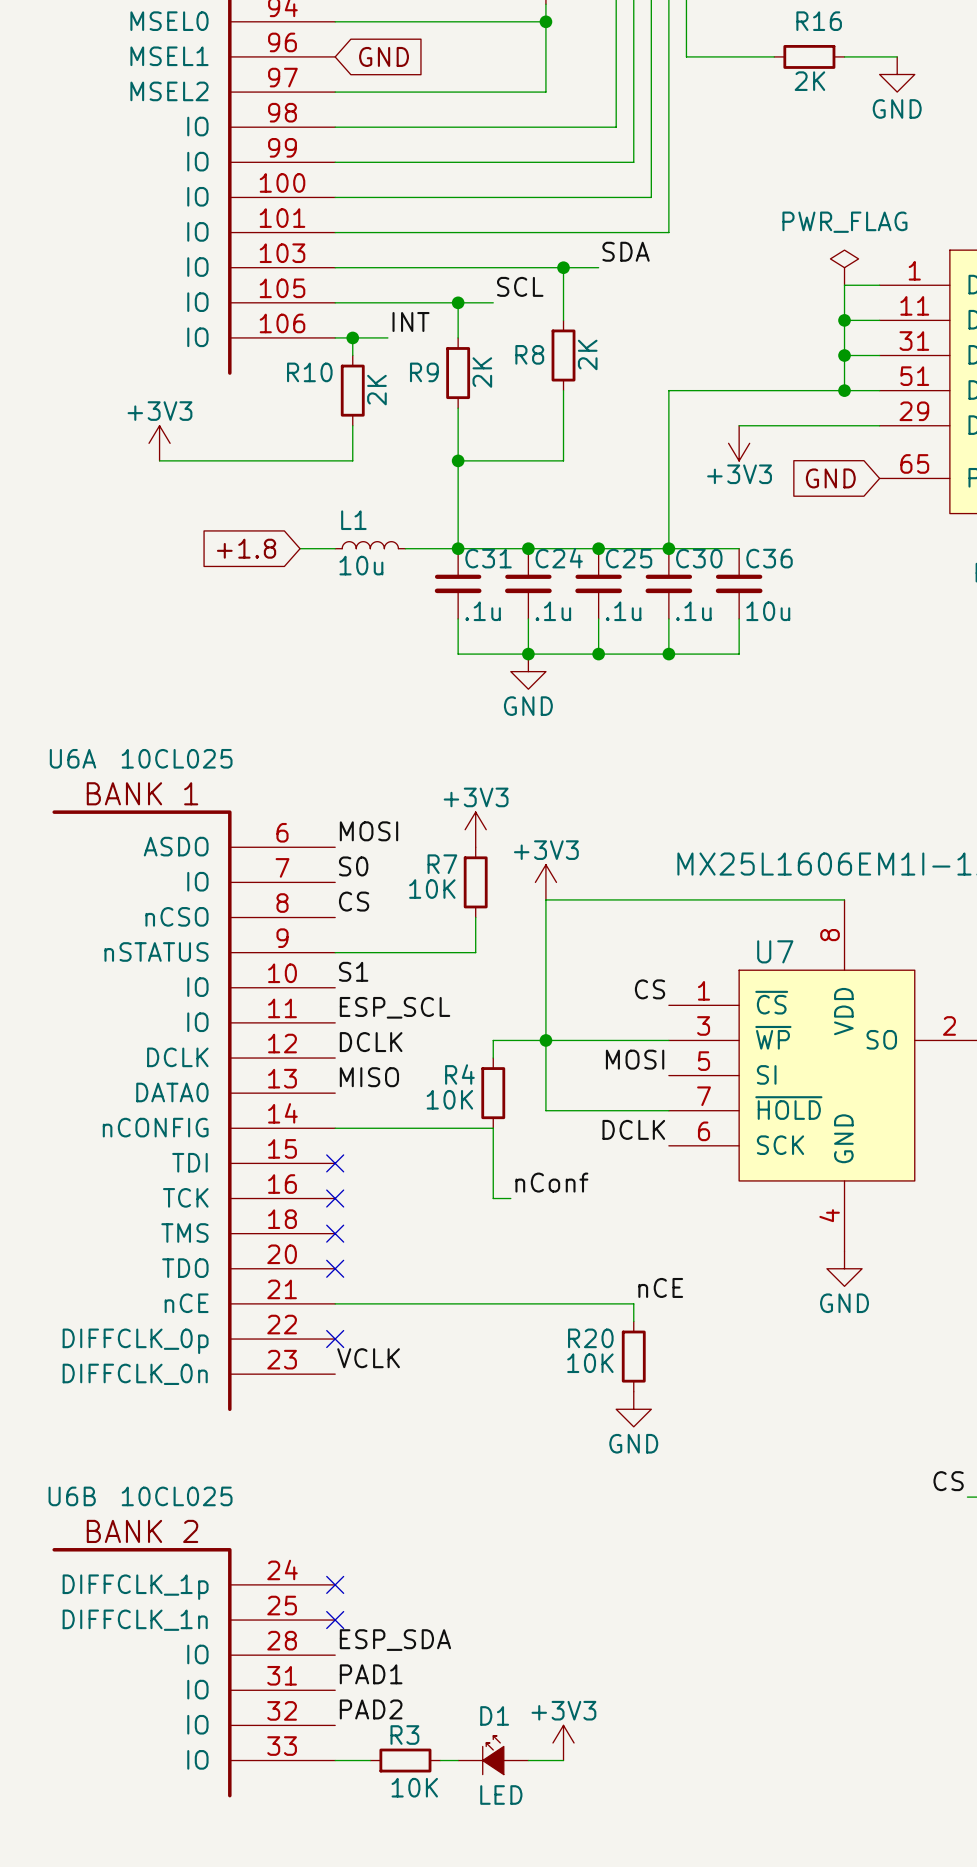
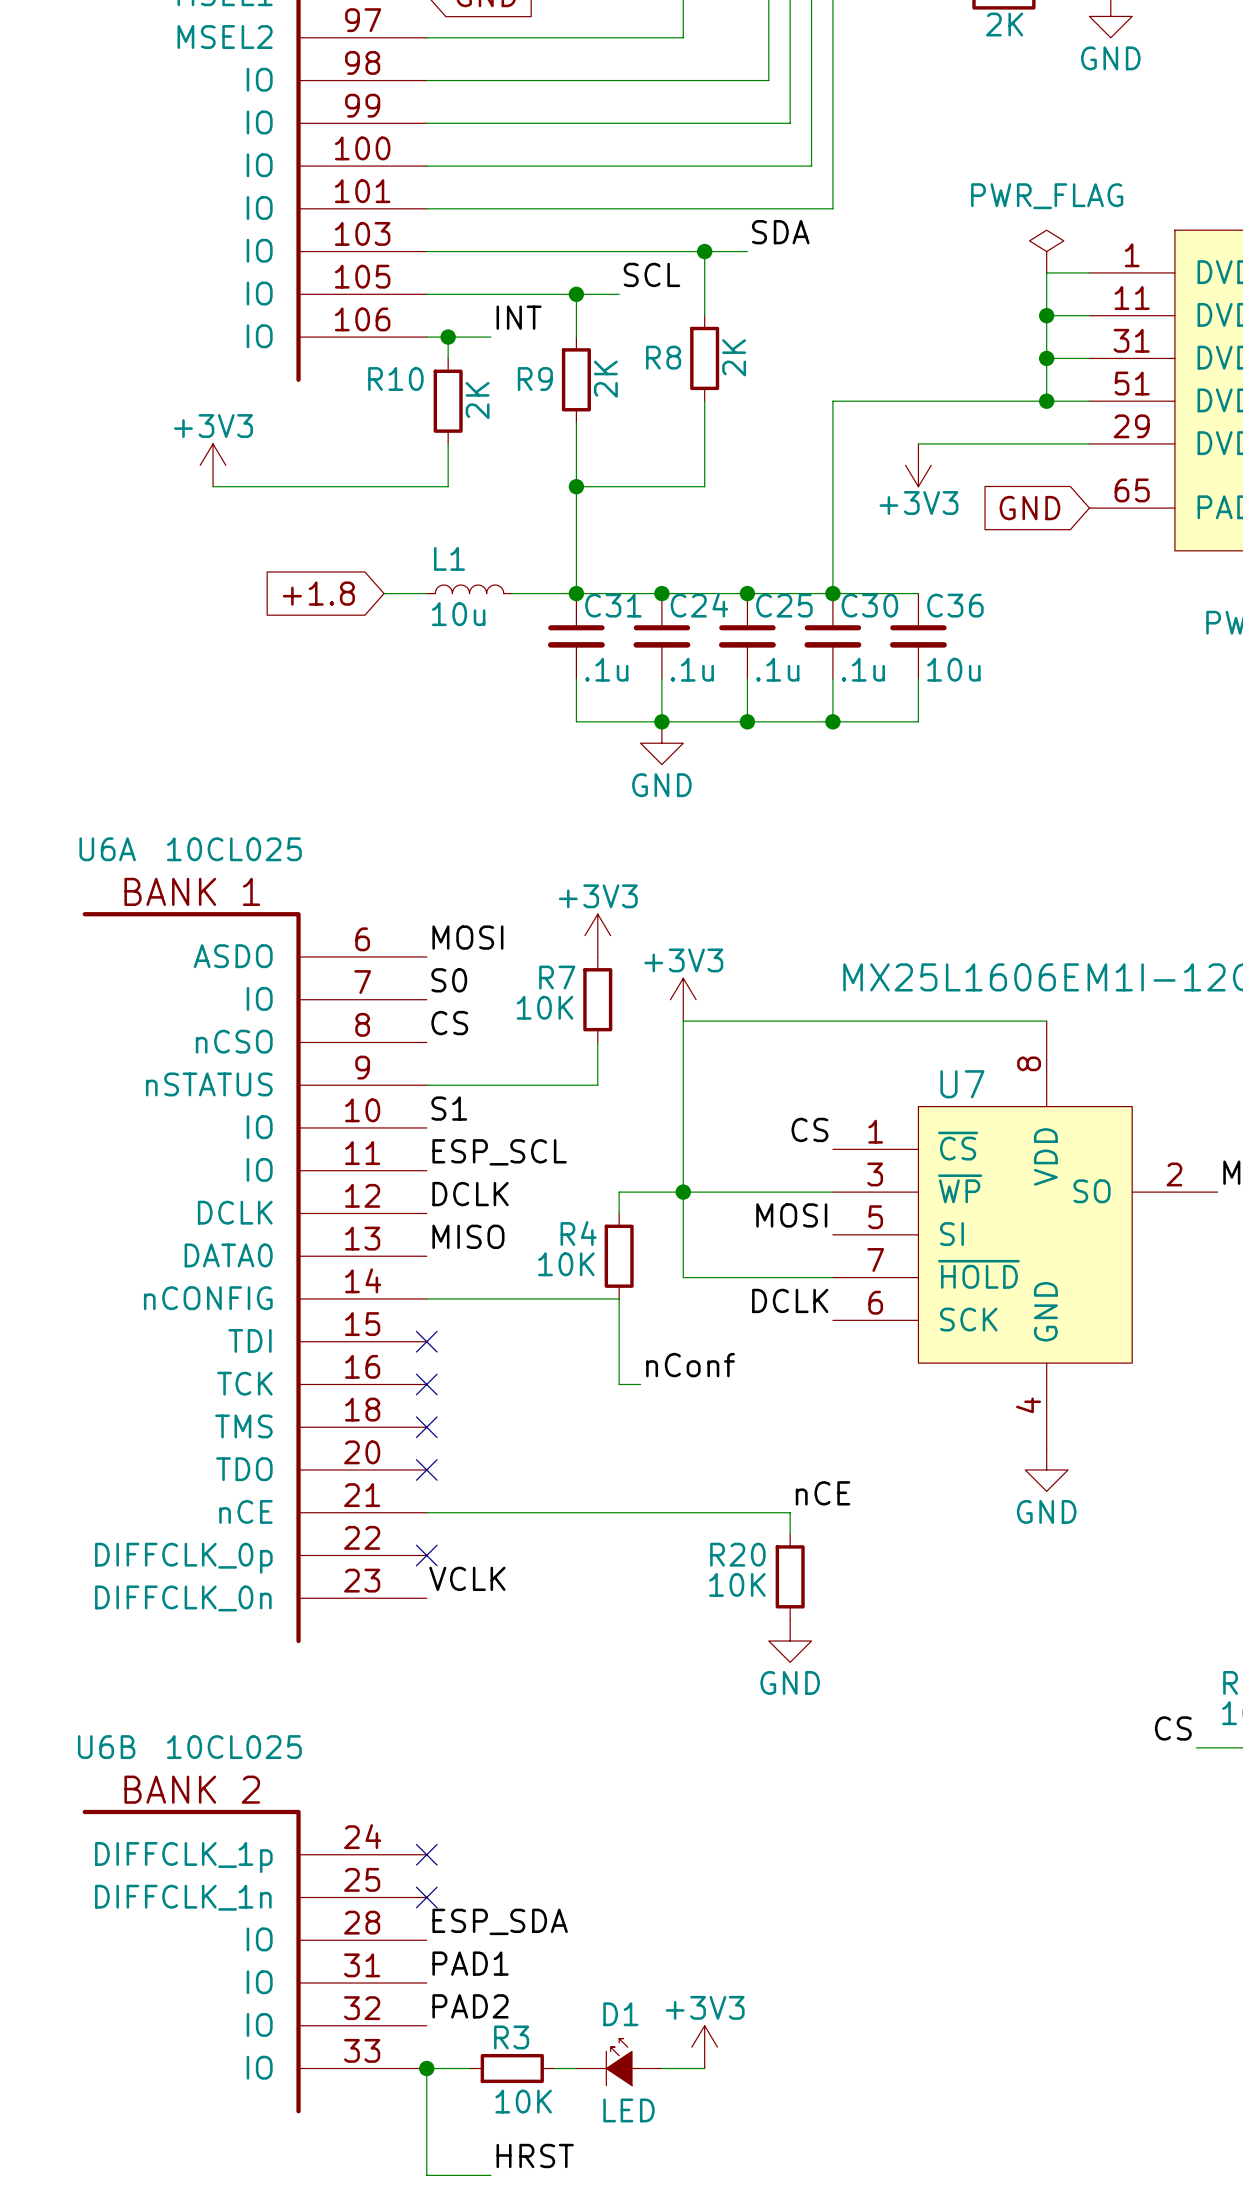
wire: none -> (426, 2068) (426, 2175) (490, 2175)
junction: none -> (426, 2068)
label: none -> HRST (535, 2155)

